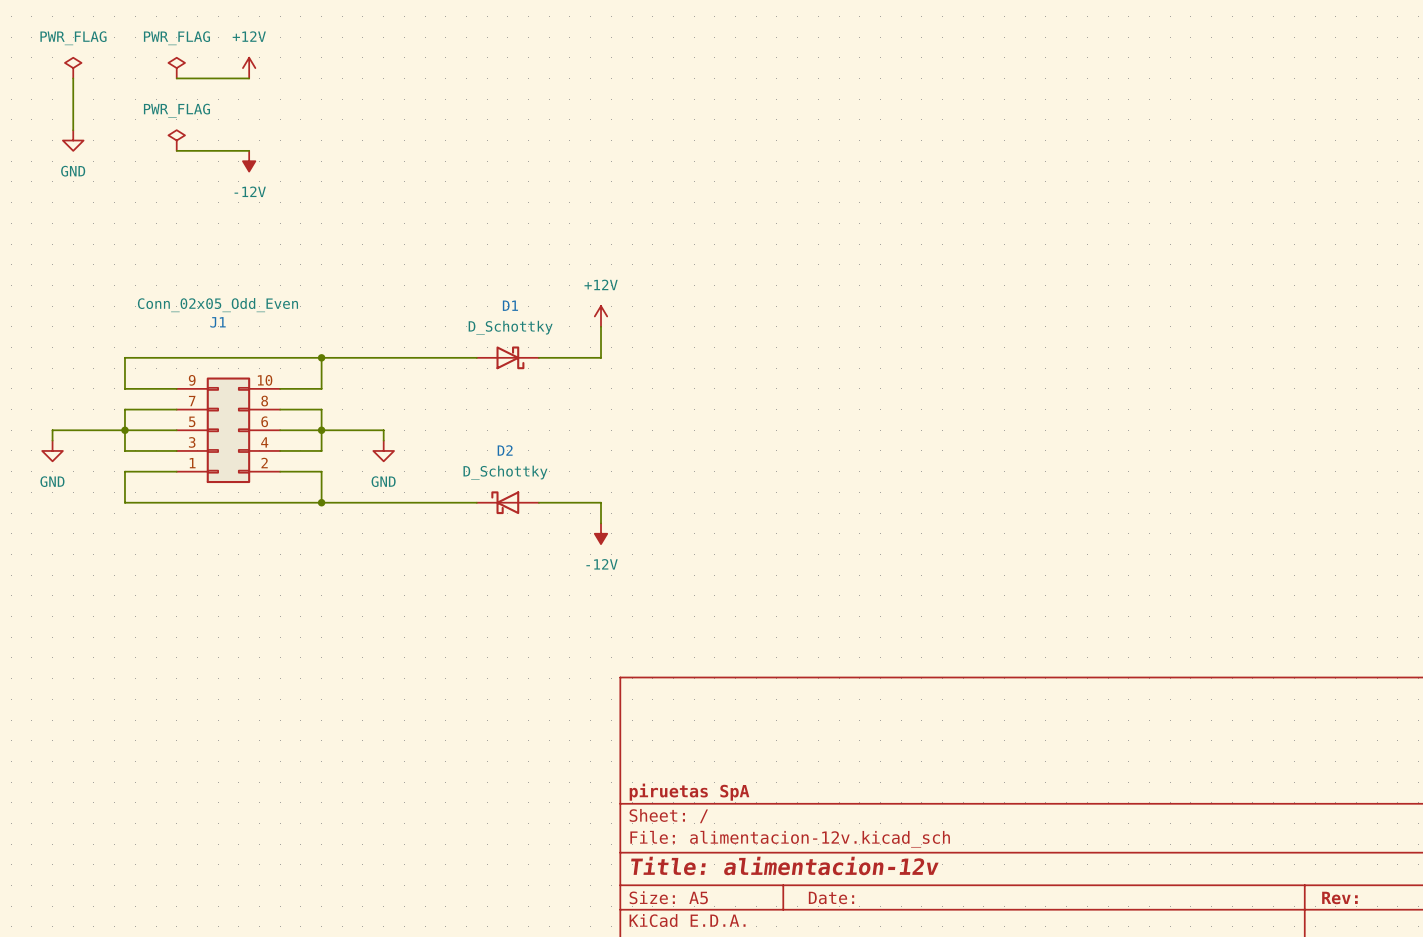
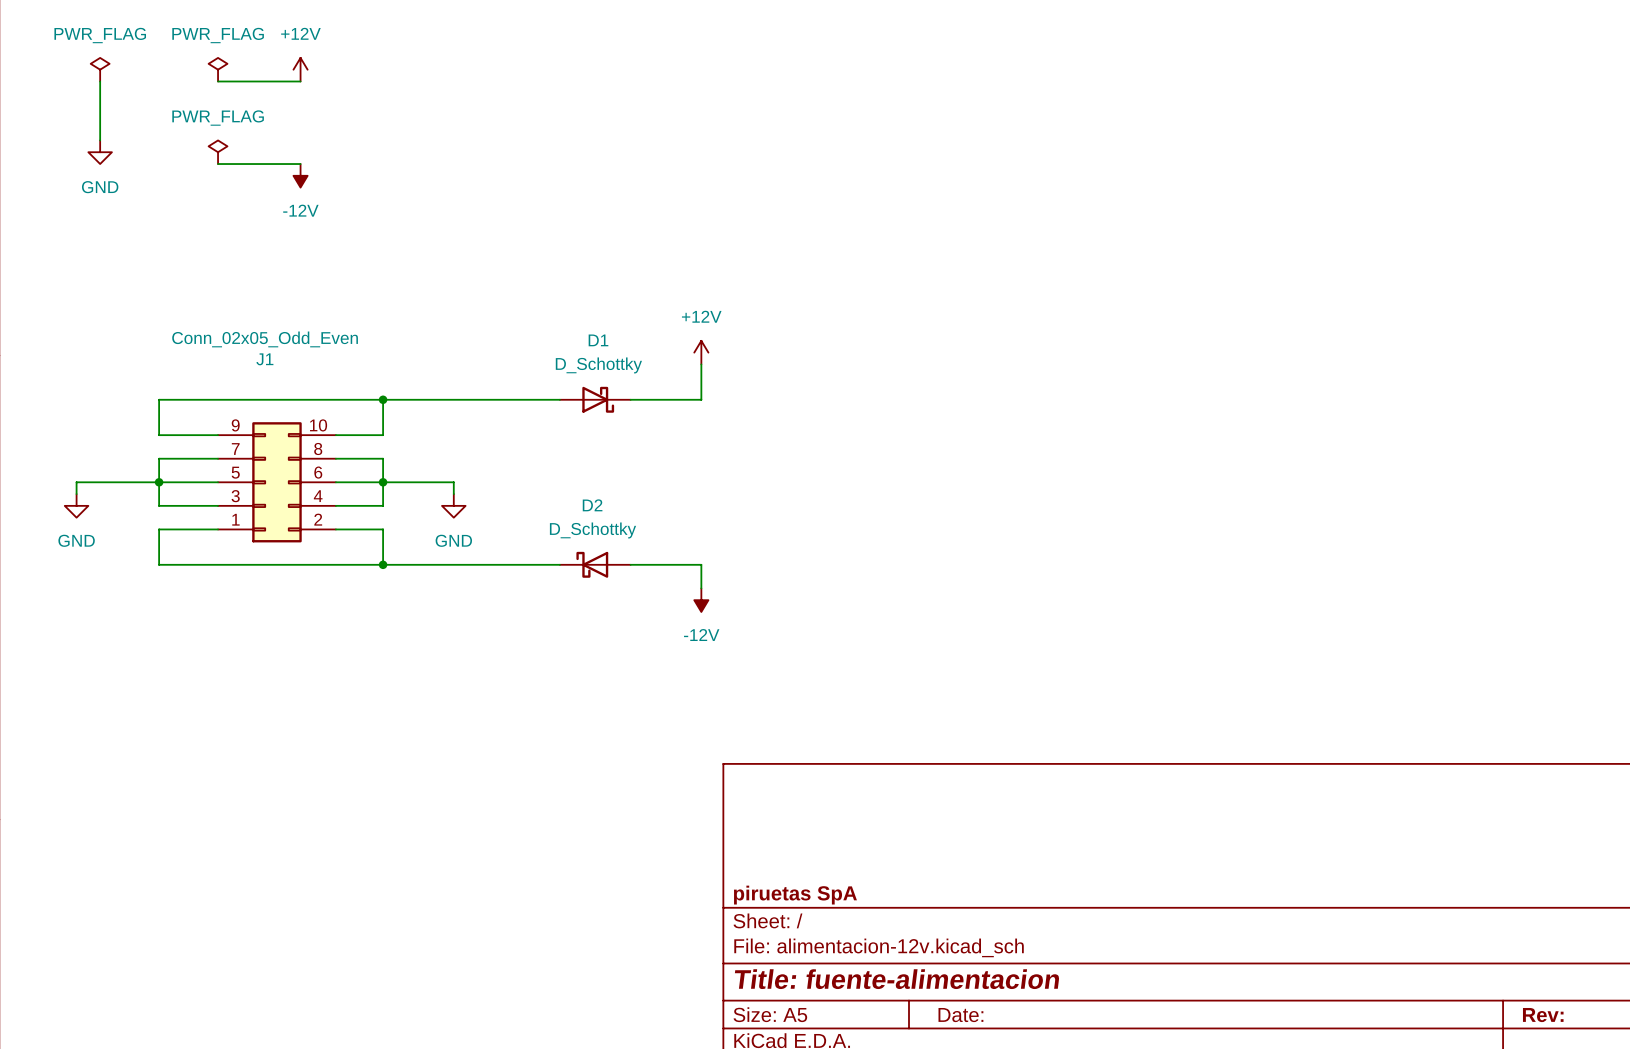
title block: Title: alimentacion-12v (784, 865) -> Title: fuente-alimentacion (897, 979)

